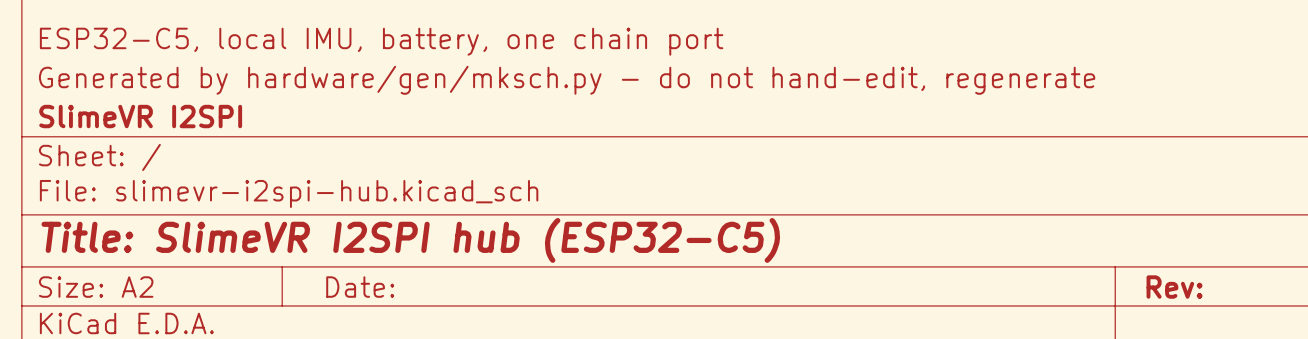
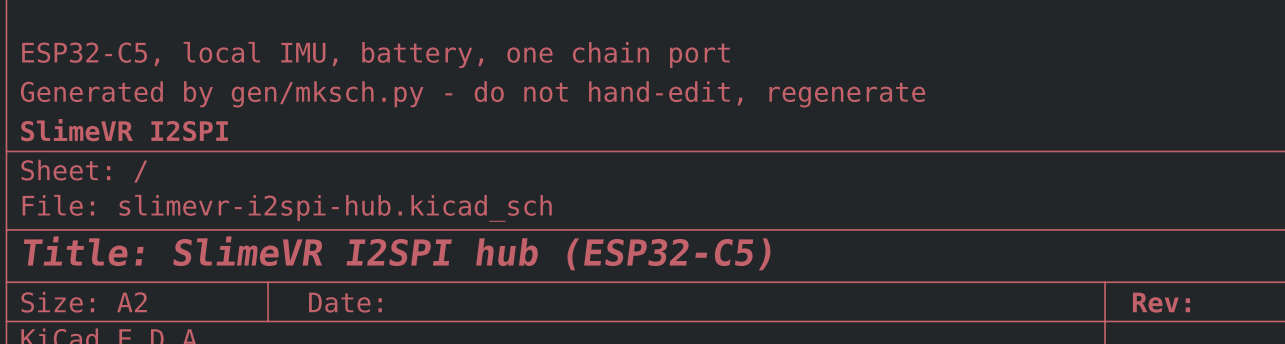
title block: Generated by hardware/gen/mksch.py - do not hand-edit, regenerate (567, 80) -> Generated by gen/mksch.py - do not hand-edit, regenerate (473, 94)

